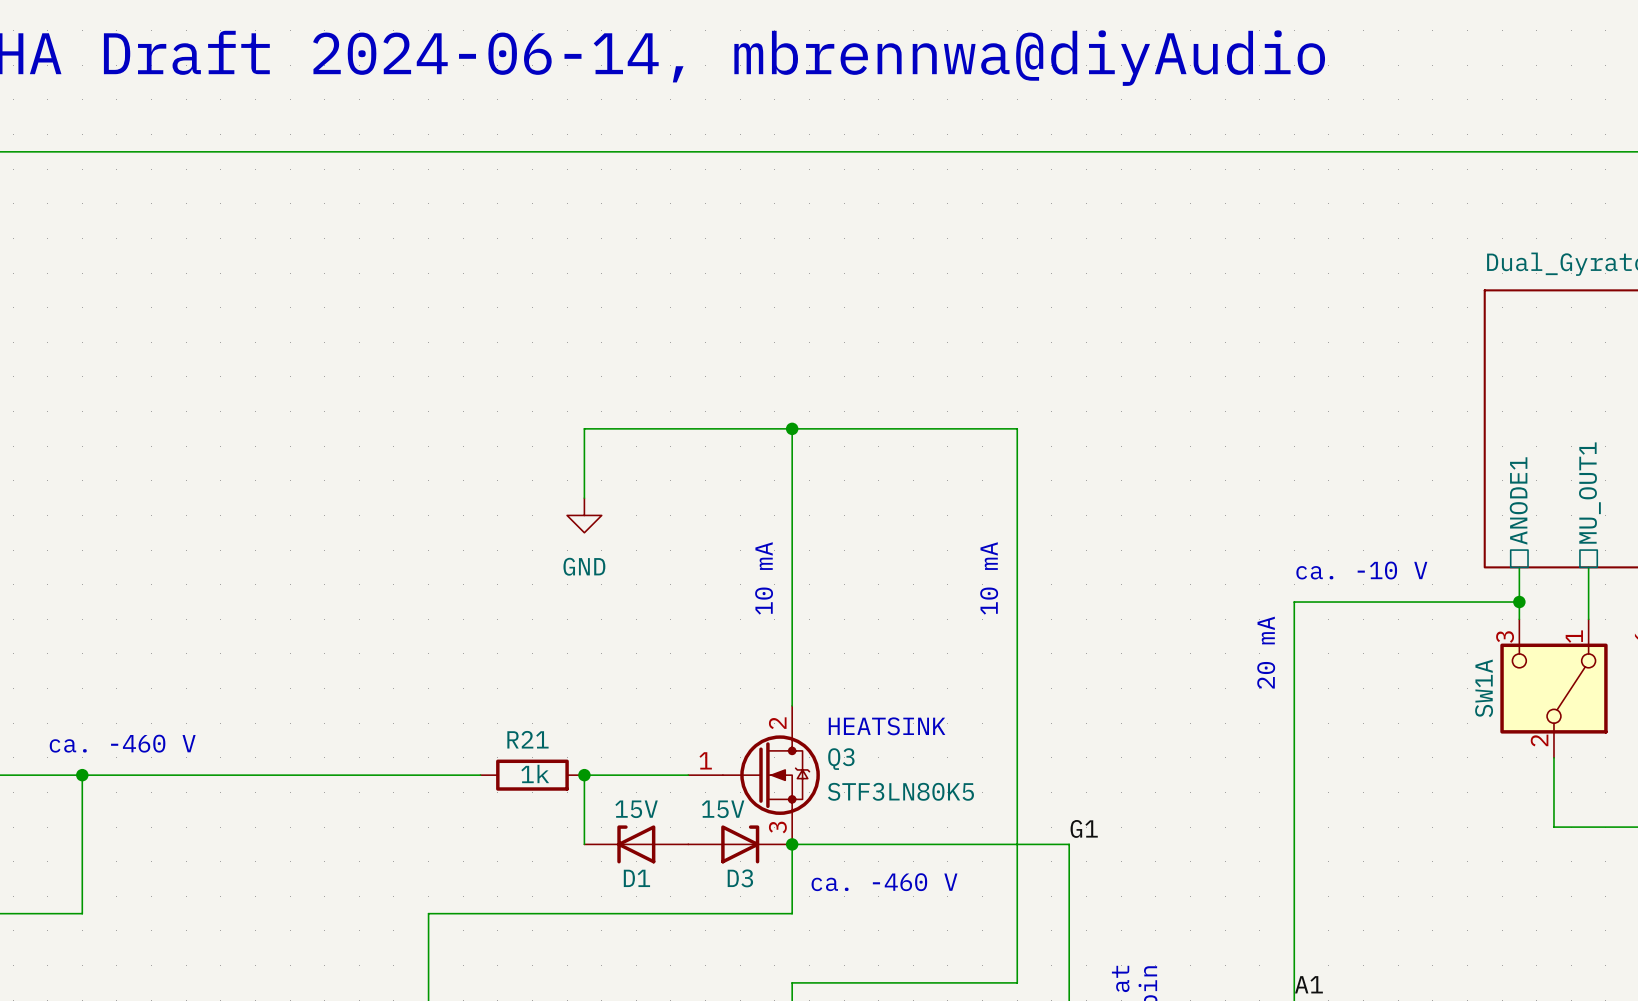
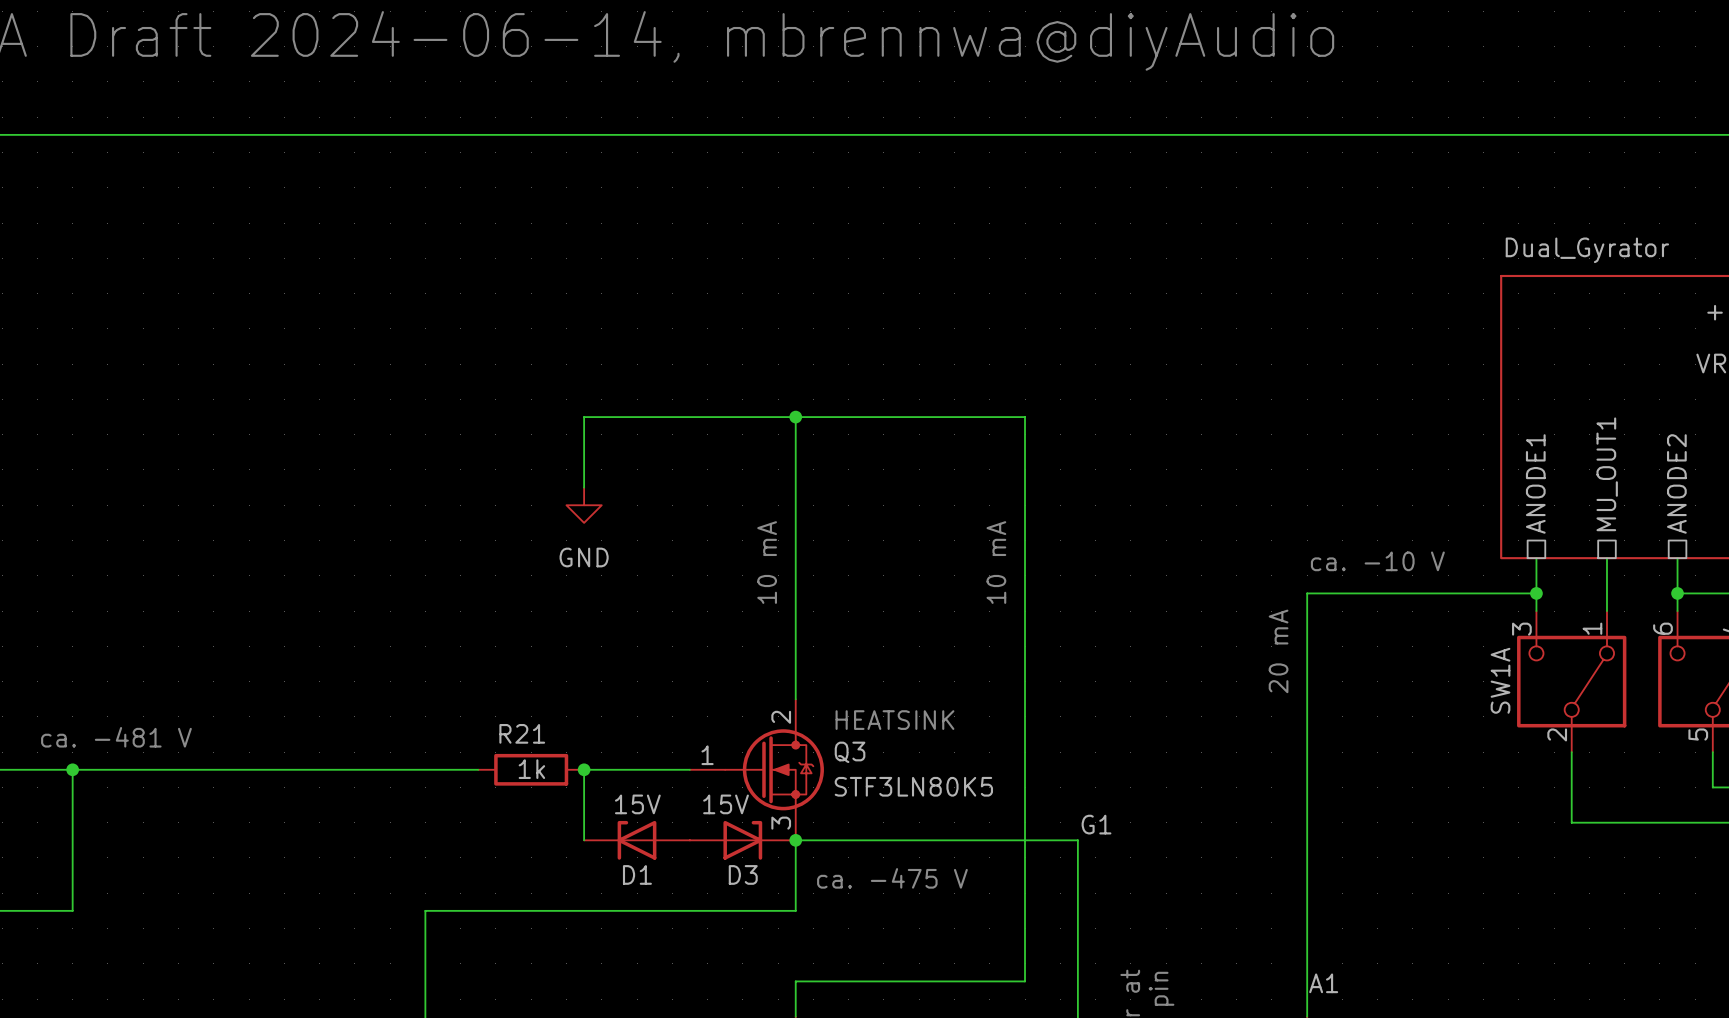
text: ca. -460 V (122, 743) -> ca. -481 V (116, 737)
text: ca. -460 V (884, 882) -> ca. -475 V (892, 878)

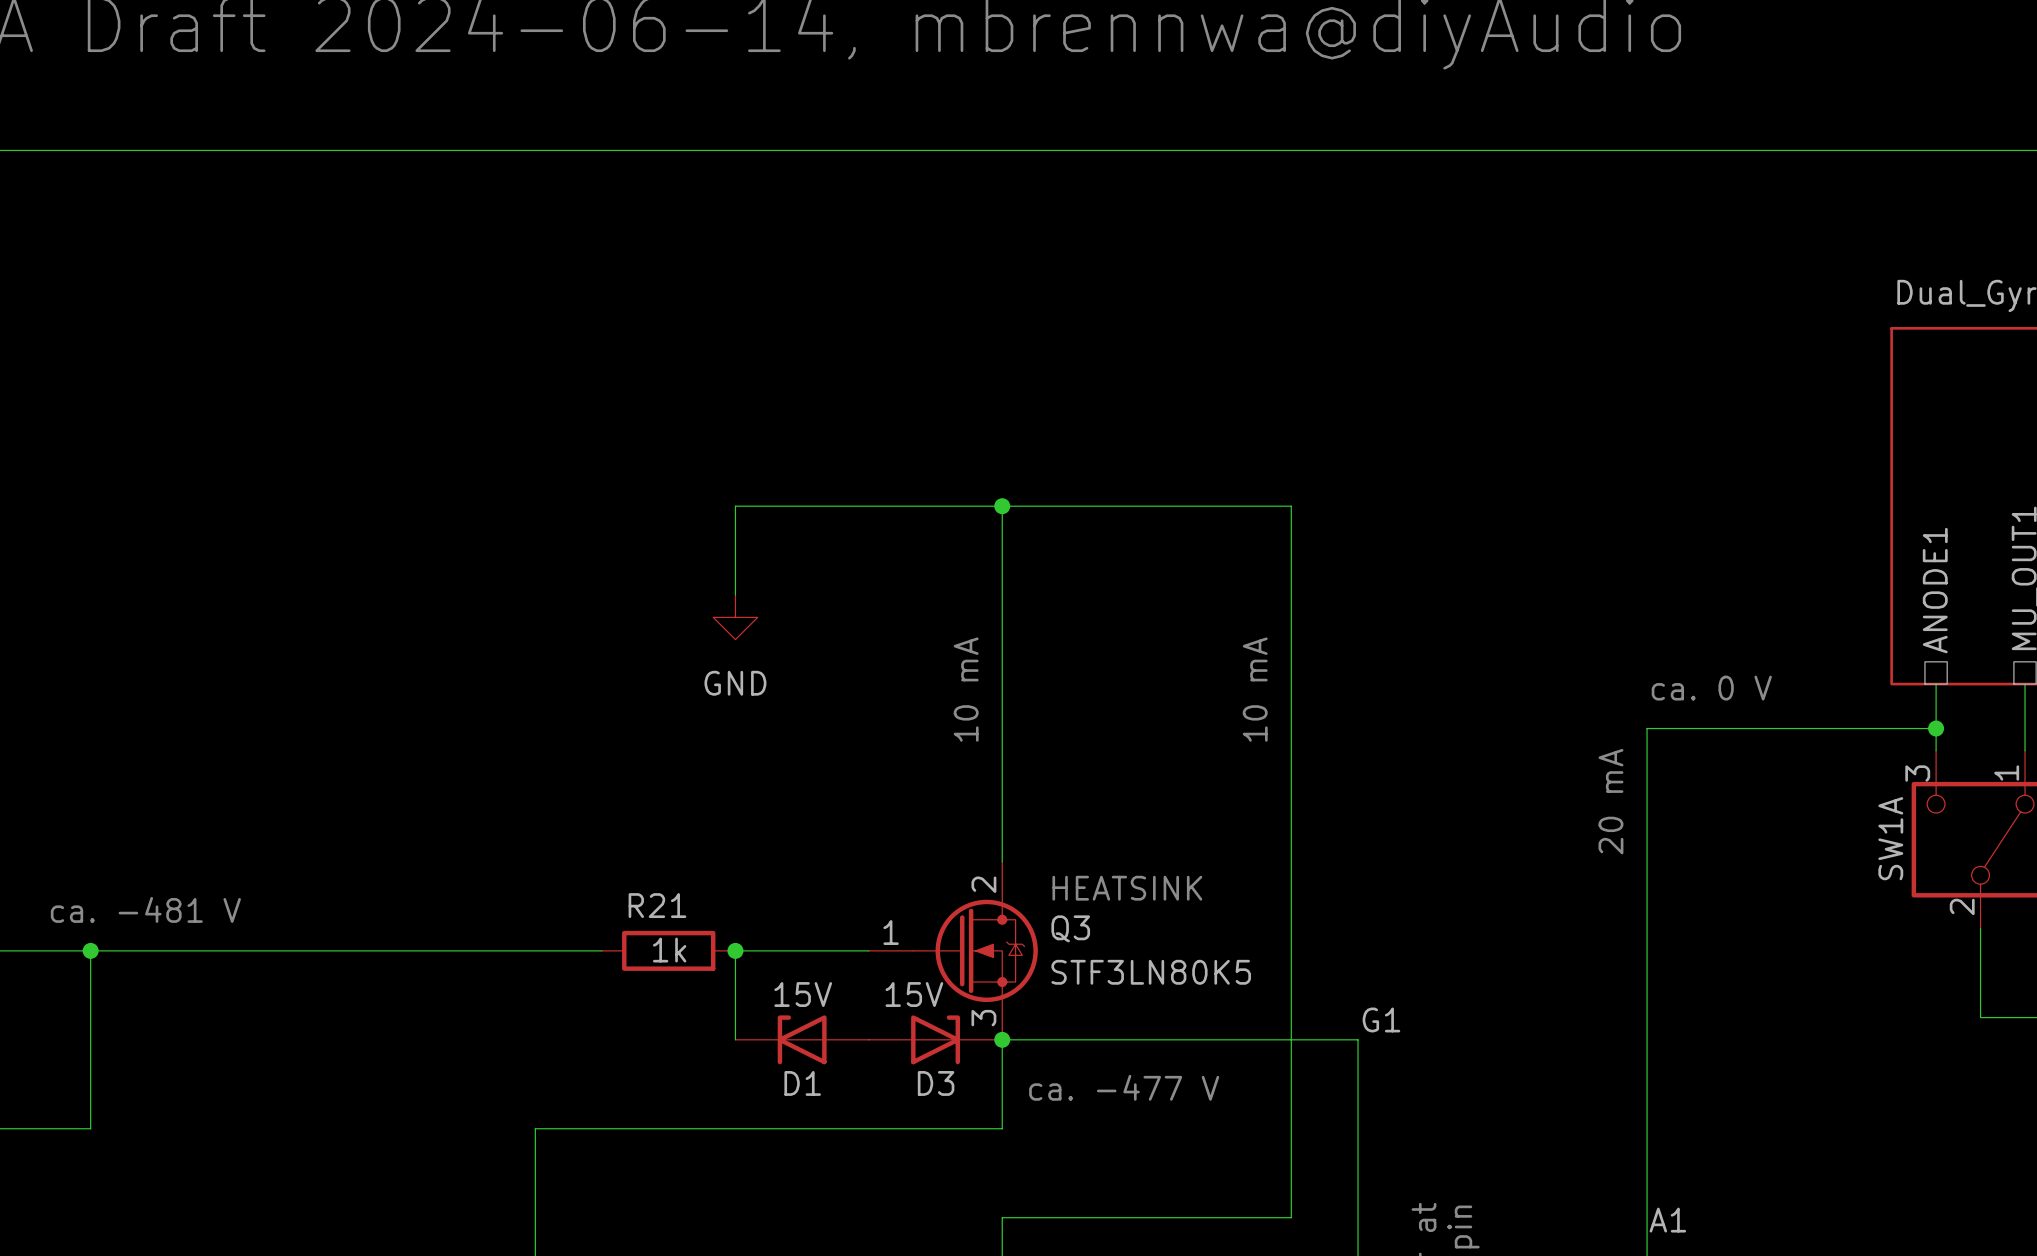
text: ca. -10 V (1377, 561) -> ca. 0 V (1711, 688)
text: ca. -475 V (892, 878) -> ca. -477 V (1124, 1087)

